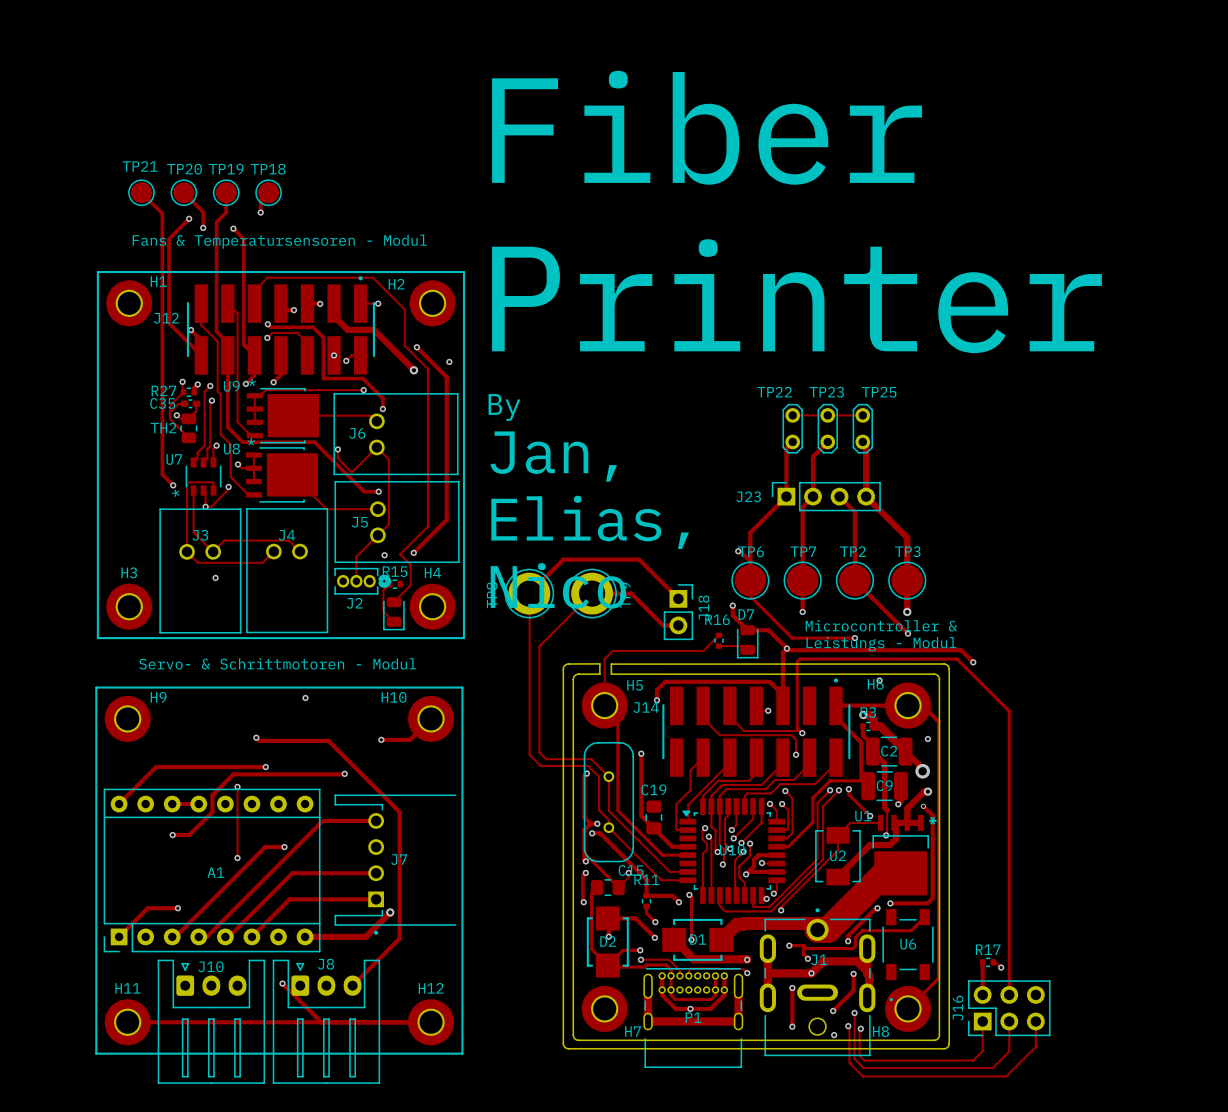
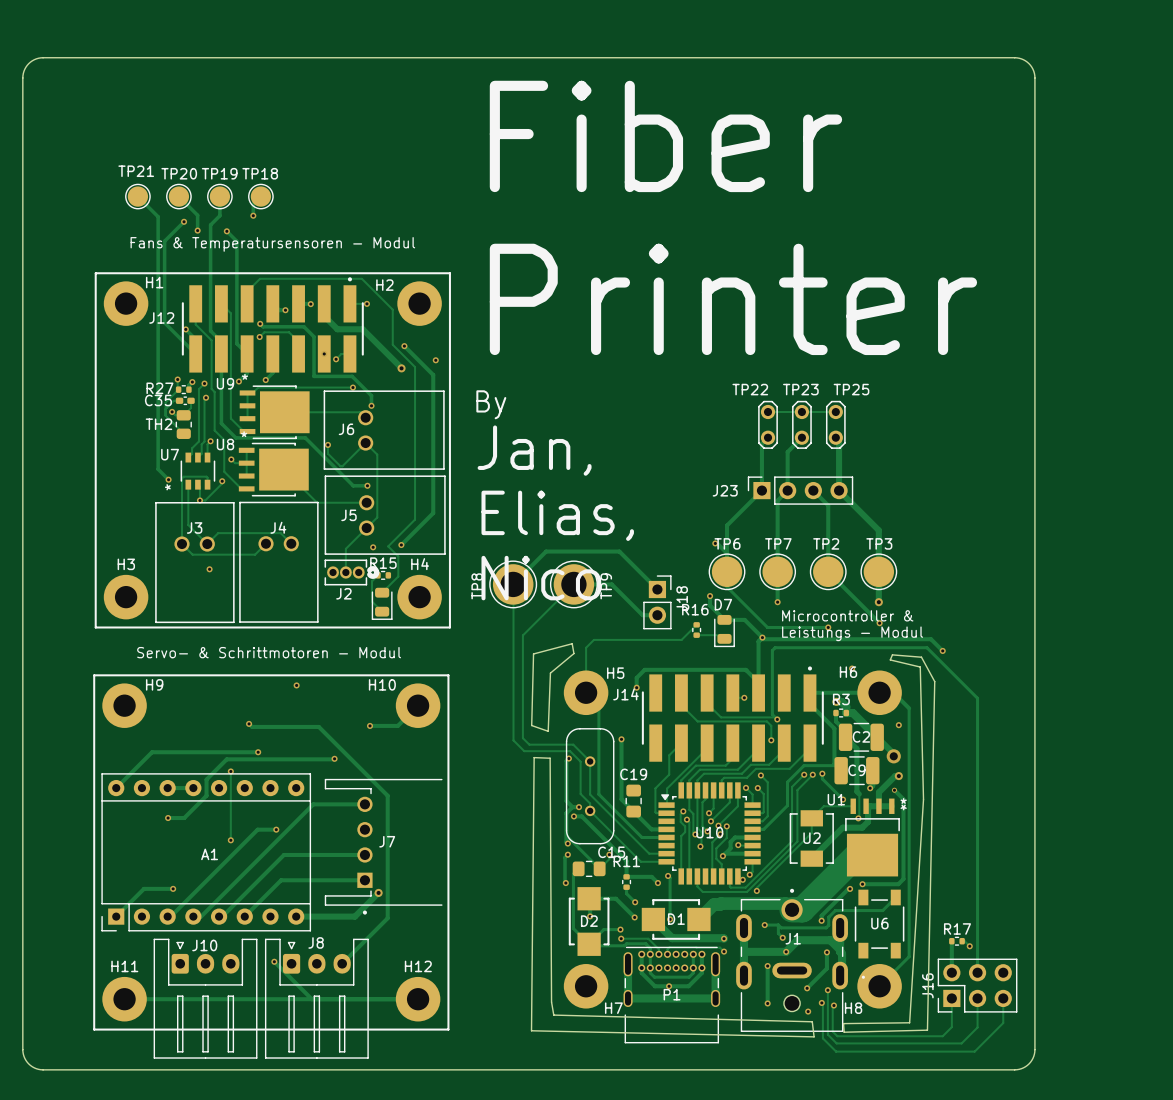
board edge: none -> (43, 57) (1014, 57) (1021, 58) (1029, 63) (1032, 69) (1034, 77) (1034, 1049) (1032, 1058) (1029, 1063) (1023, 1067) (1014, 1069) (43, 1069) (36, 1068) (28, 1063) (23, 1056) (22, 1049) (22, 77) (24, 69) (28, 63) (34, 59) (43, 57)
board edge: none -> (572, 643) (533, 653) (531, 725) (548, 731) (550, 673) (573, 653) (572, 643)
board edge: (568, 664) (564, 665) (563, 669) (563, 1043) (564, 1047) (568, 1048) (943, 1048) (947, 1047) (949, 1043) (949, 669) (947, 665) (943, 664) (611, 664) (611, 674) -> none
board edge: (568, 664) (599, 663) (599, 674) (577, 674) (573, 678) (573, 1035) (574, 1038) (578, 1040) (934, 1040) (937, 1038) (939, 1035) (939, 679) (937, 675) (934, 674) (611, 674) -> none
board edge: none -> (892, 654) (890, 659) (920, 667) (923, 799) (909, 1022) (843, 1023) (844, 1032) (927, 1030) (934, 681) (921, 657) (892, 654)
board edge: none -> (534, 757) (550, 758) (551, 1002) (553, 1015) (812, 1021) (814, 1036) (531, 1030) (534, 757)

